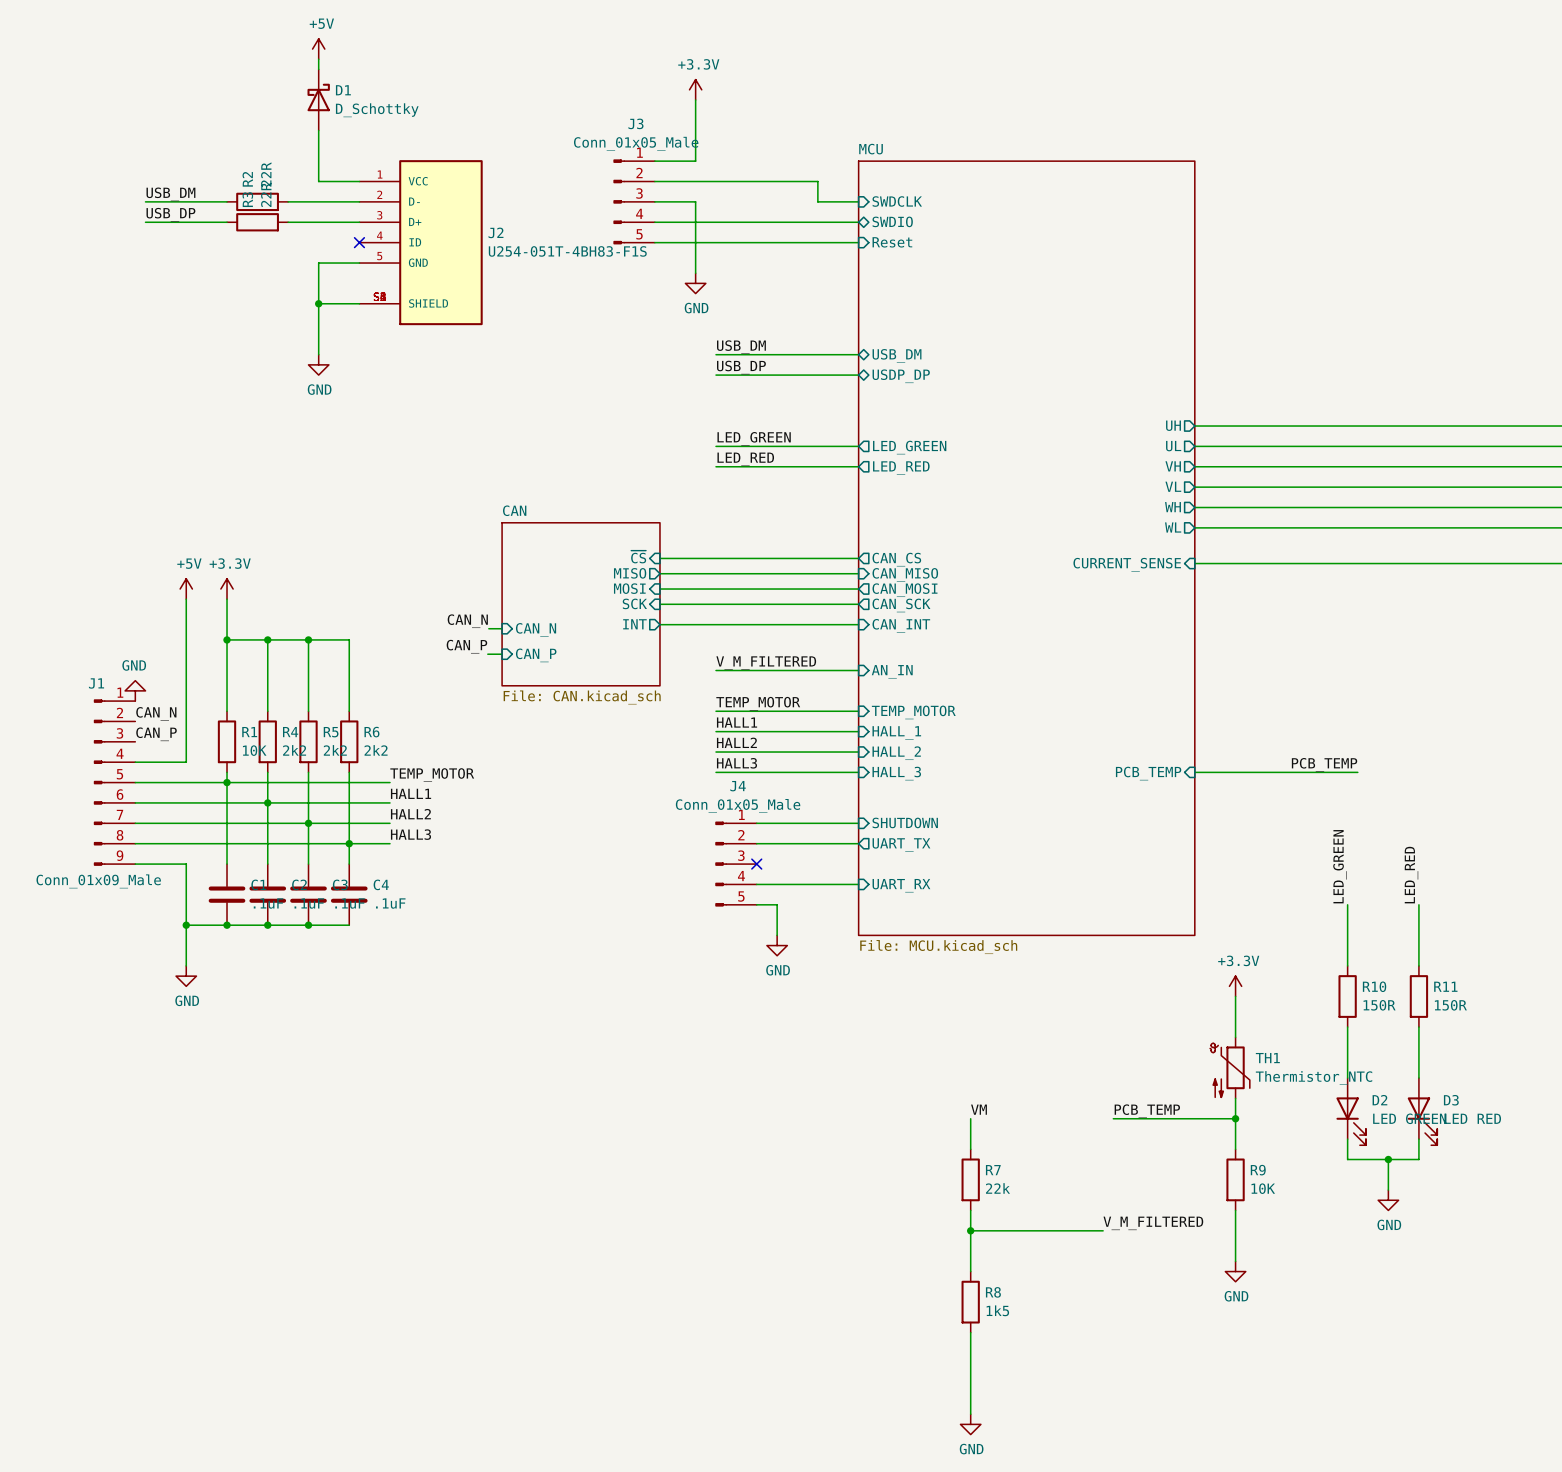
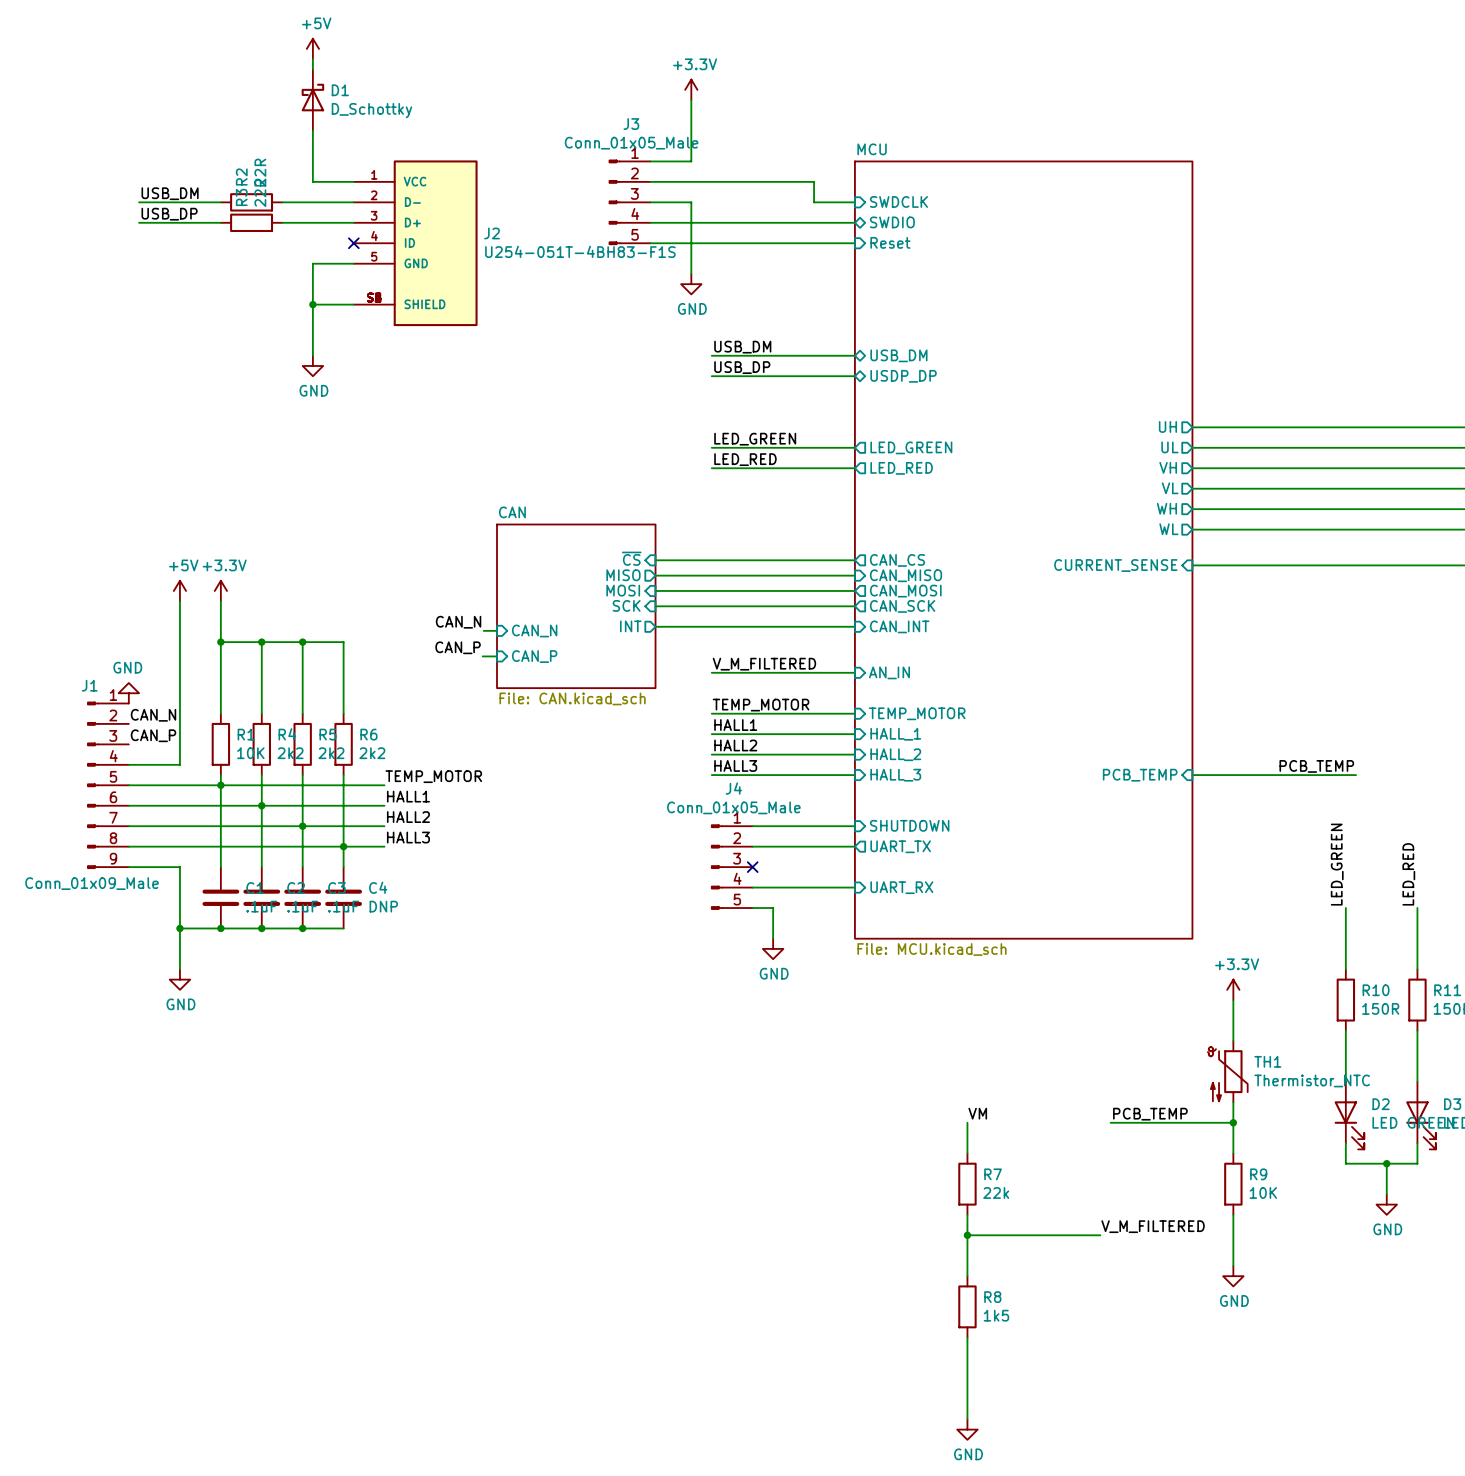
C4 value: .1uF (390, 903) -> DNP (383, 906)

